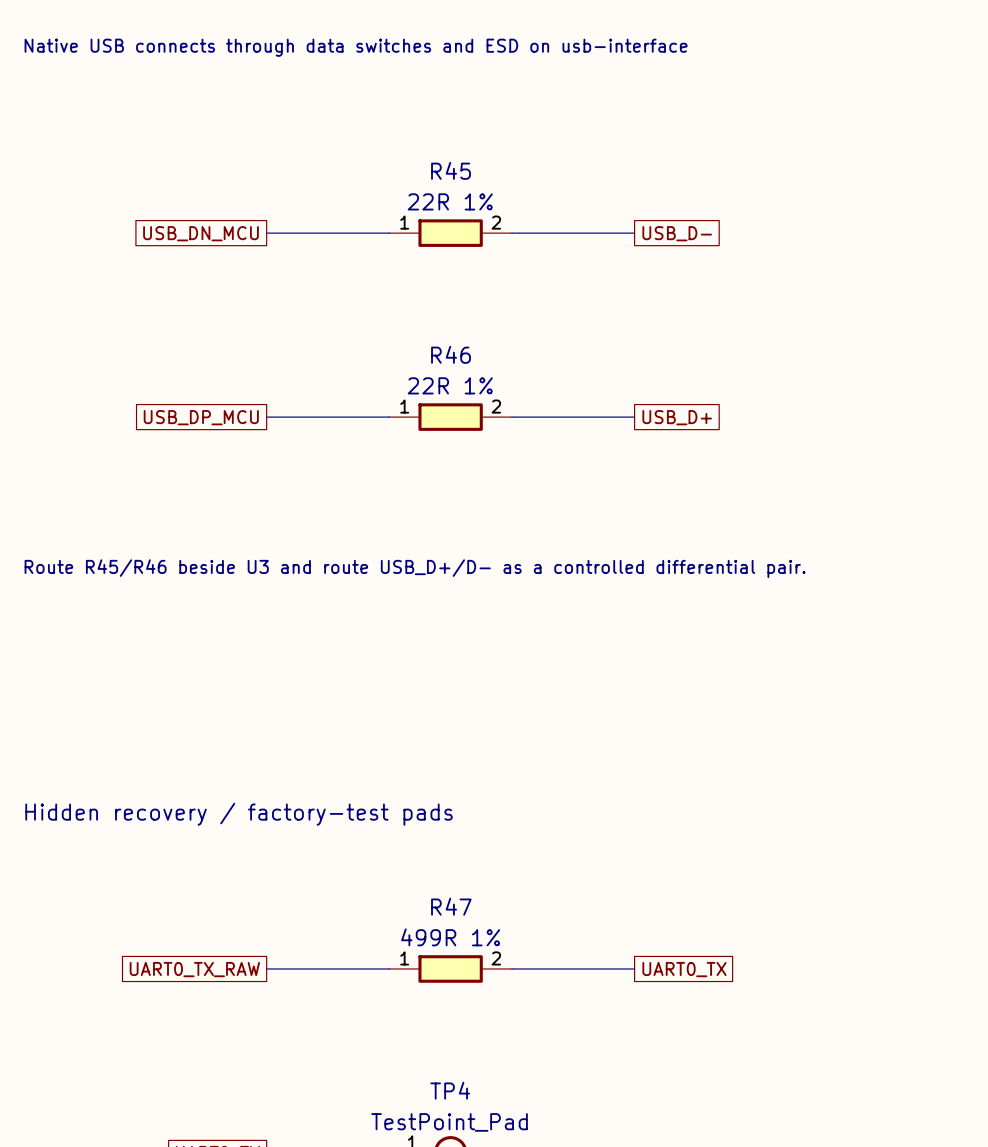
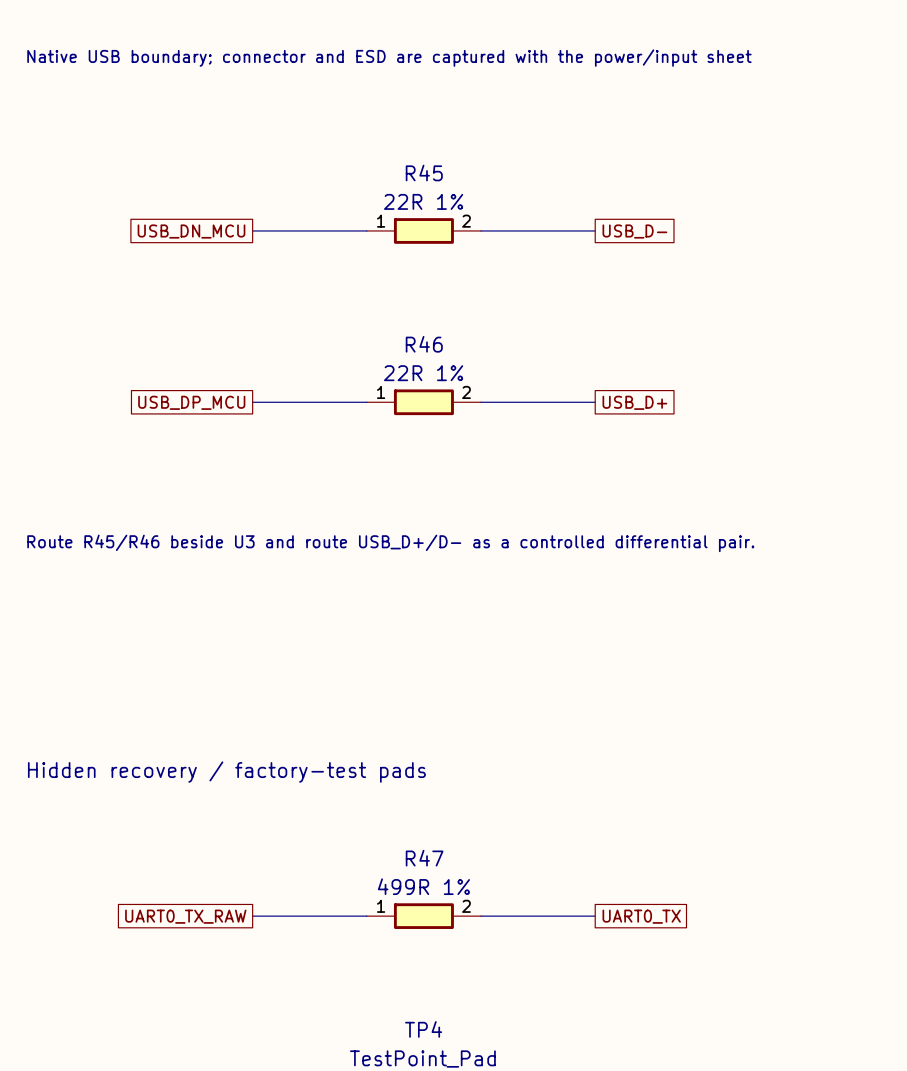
text: Native USB connects through data switches and ESD on usb-interface (356, 47) -> Native USB boundary; connector and ESD are captured with the power/input sheet (389, 58)

